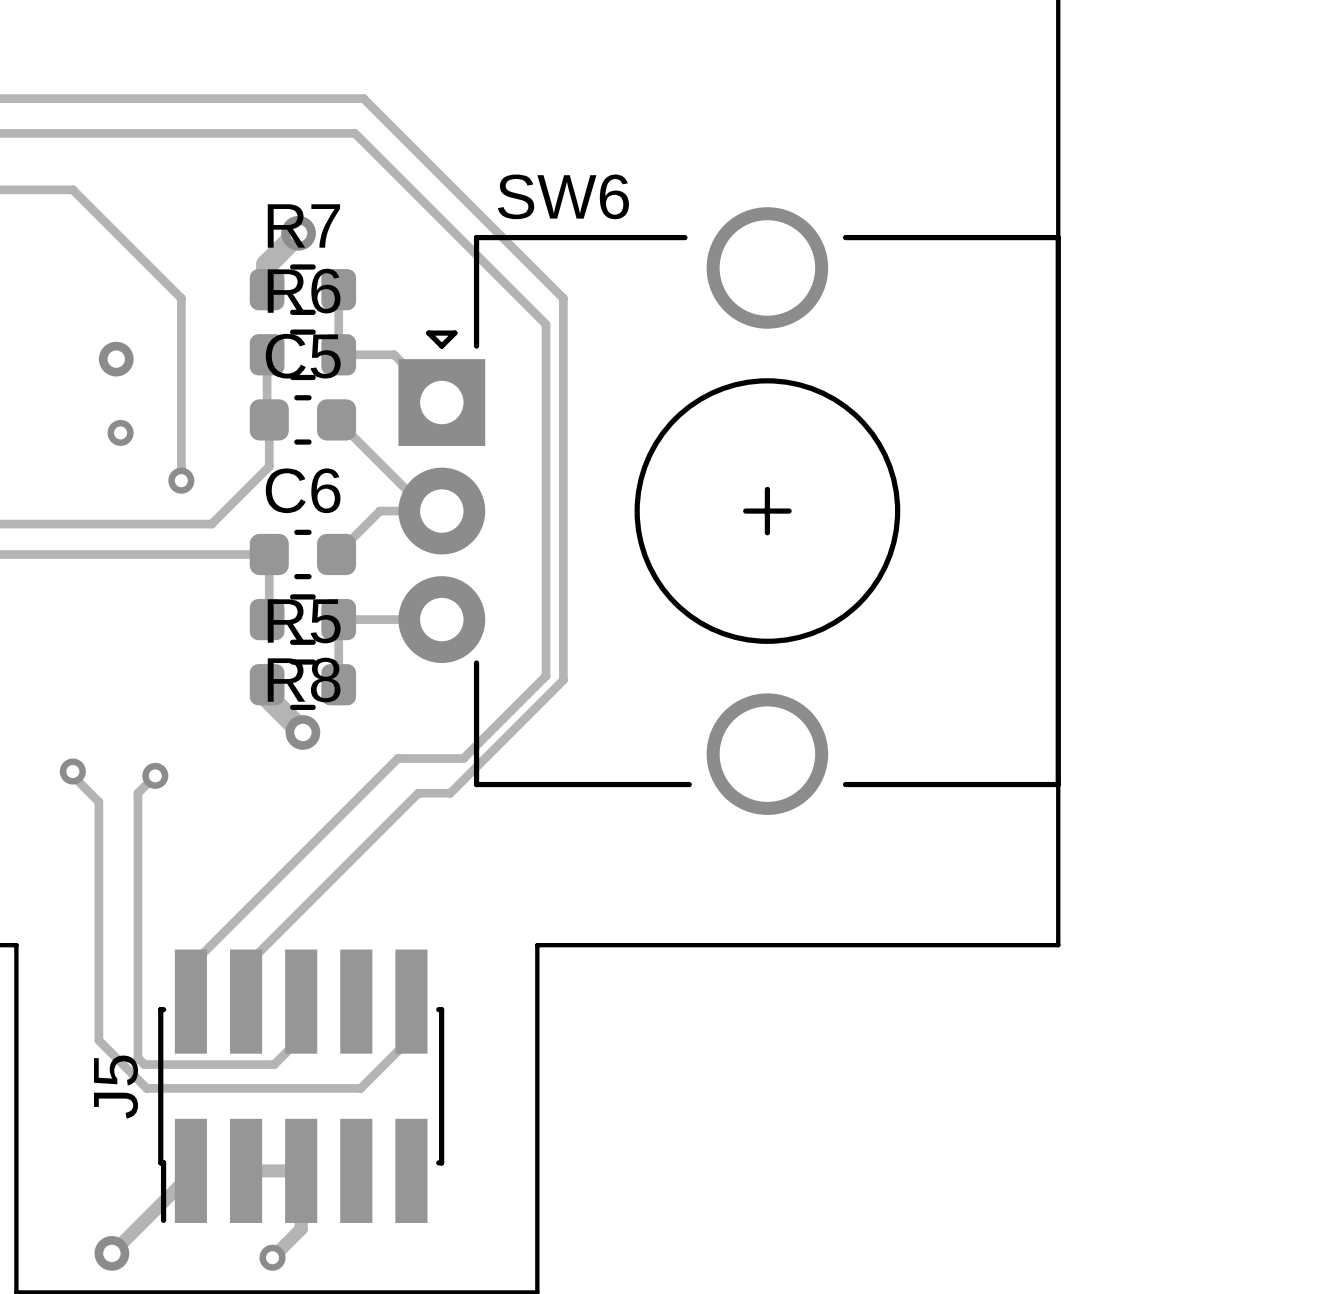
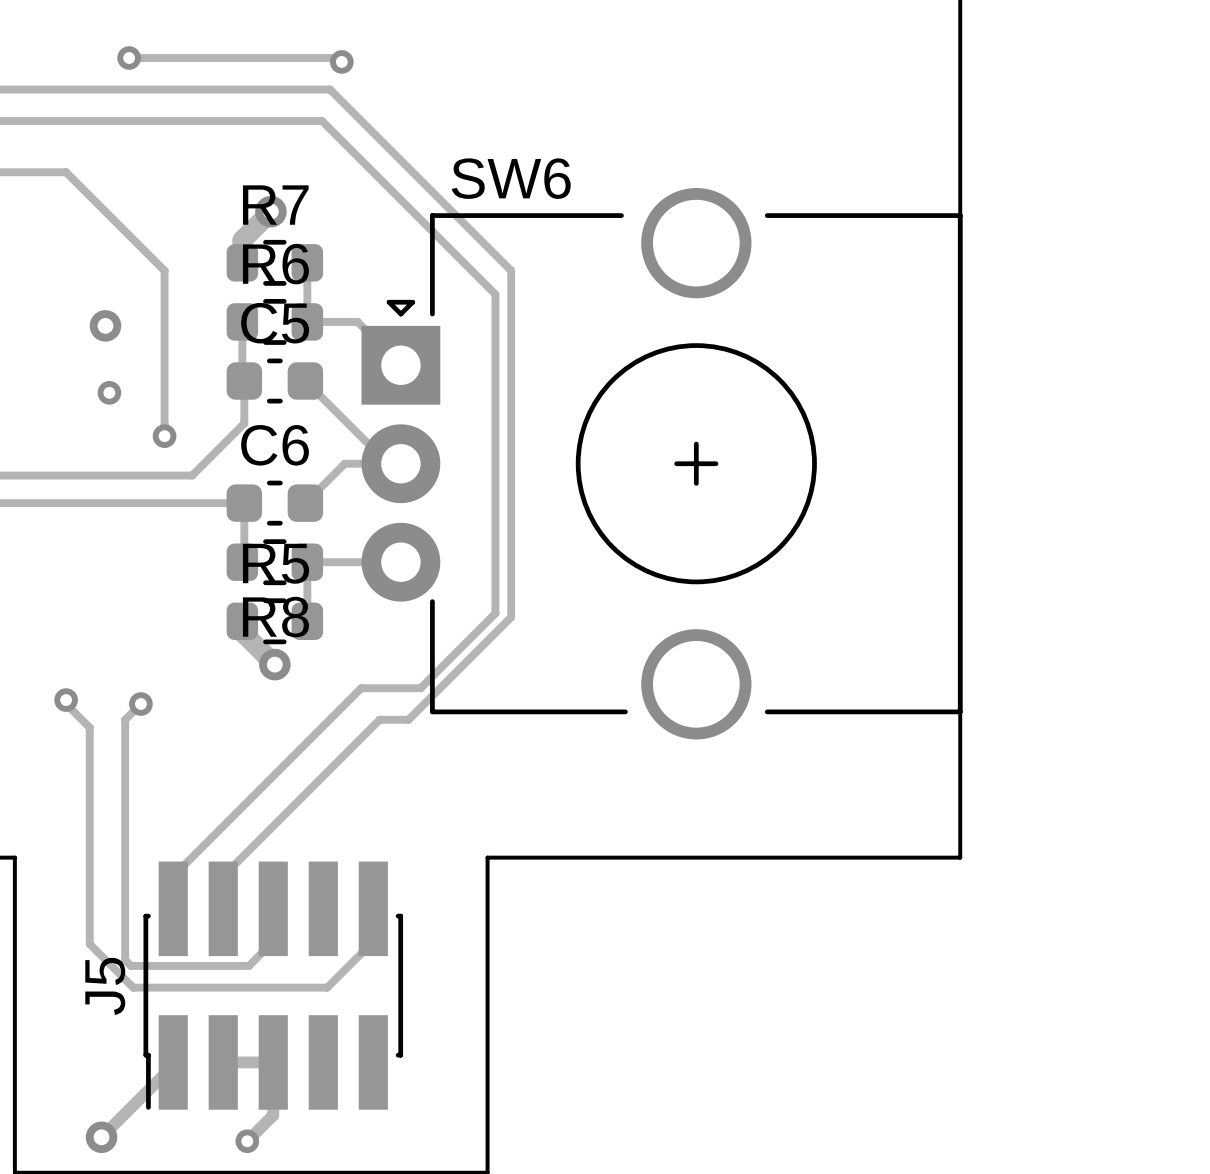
track: none -> (129, 58) (337, 58) (341, 61)
via: none -> (129, 58)
via: none -> (341, 61)

